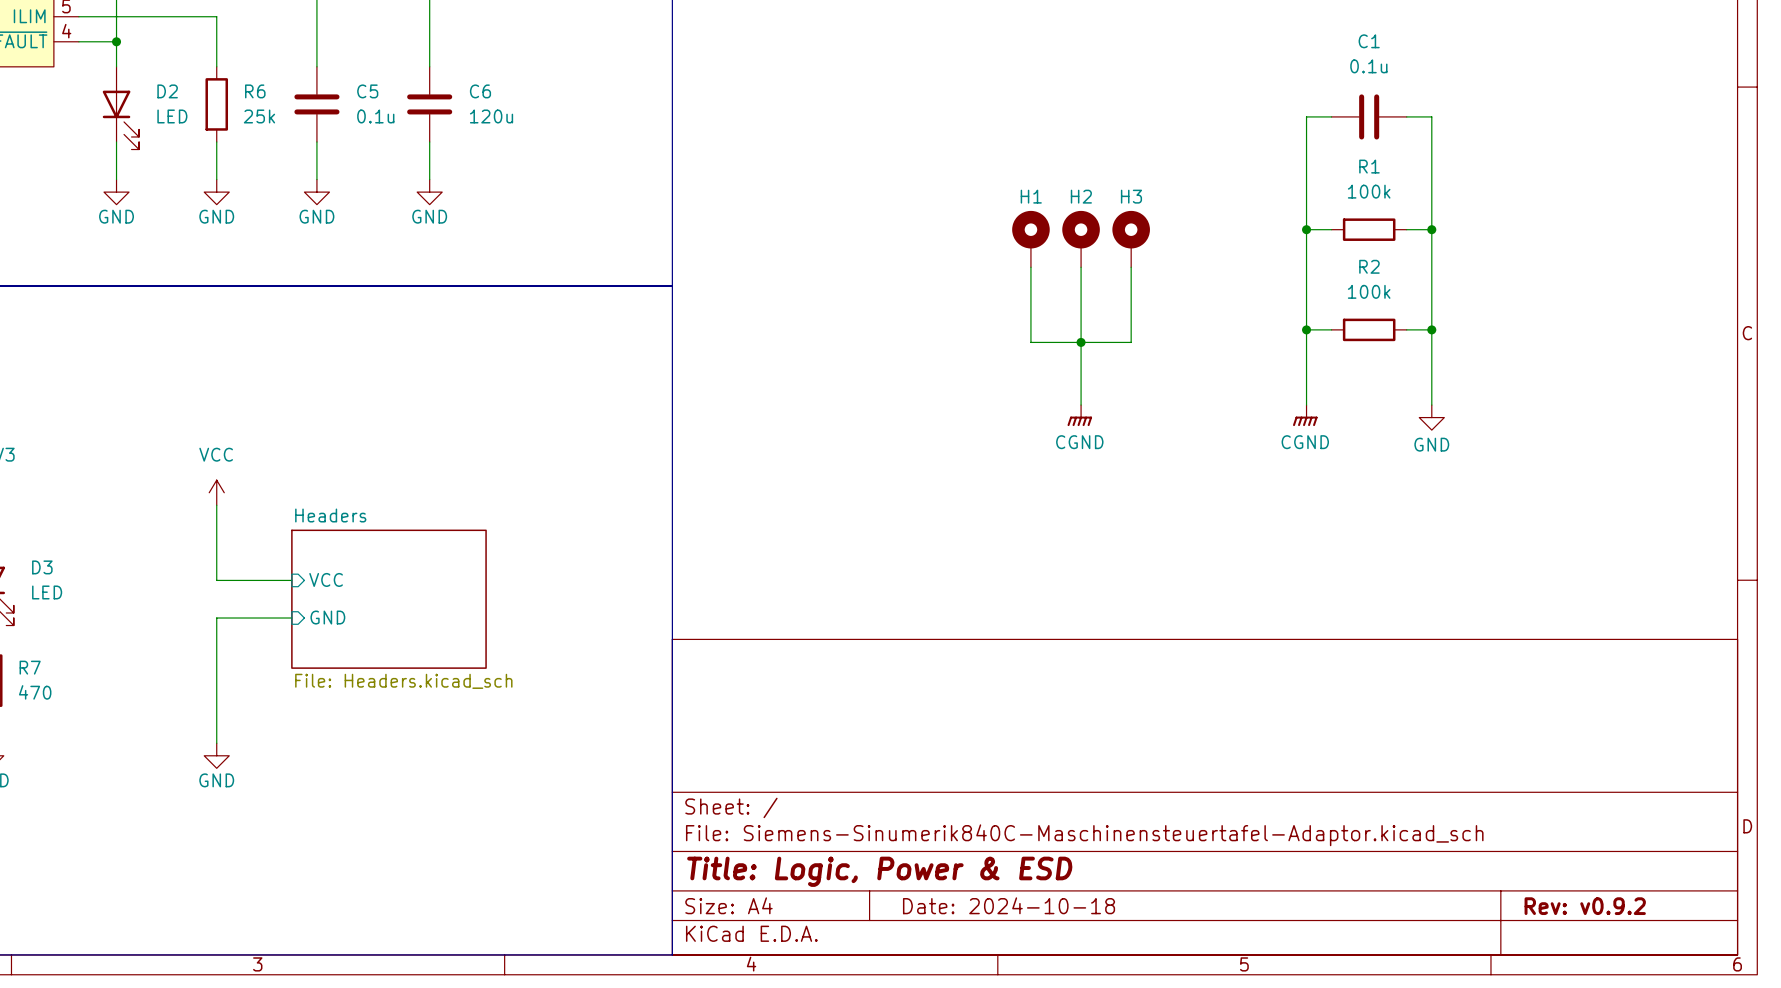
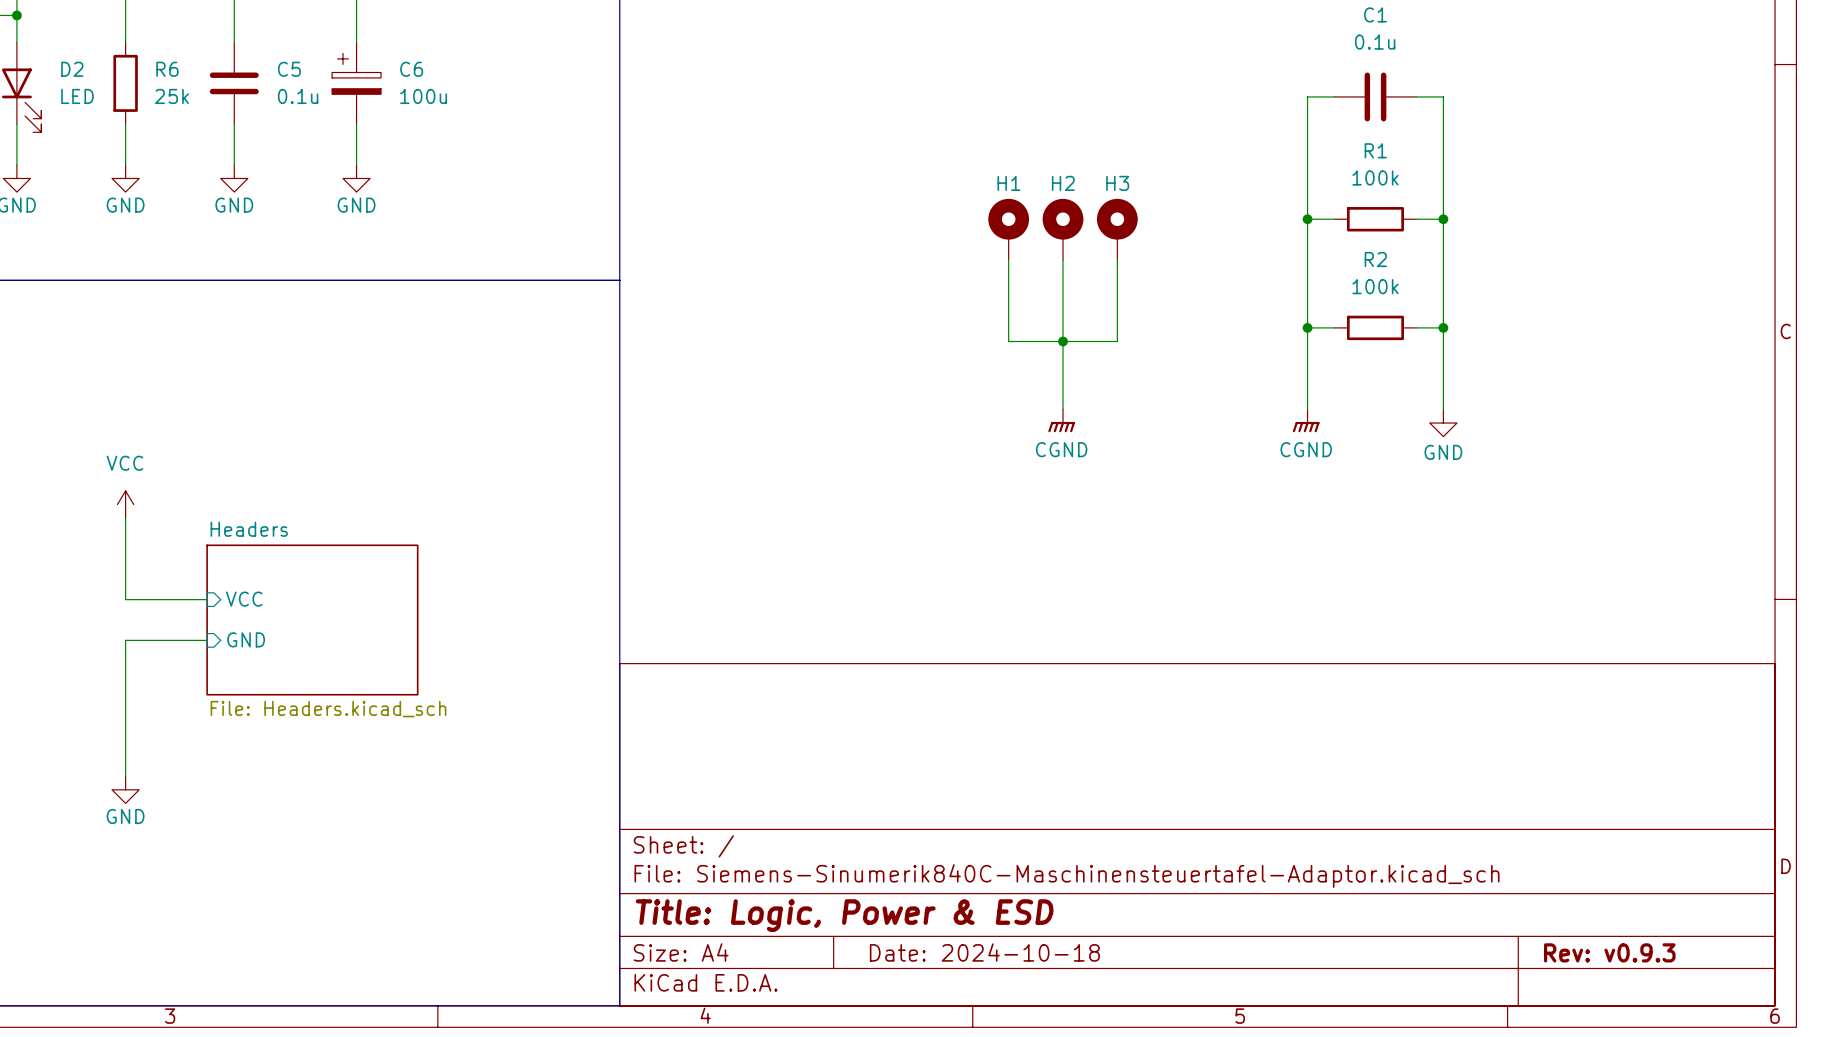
C6 symbol: [407, 66, 453, 143] -> [332, 42, 382, 125]
C6 value: 120u (491, 116) -> 100u (423, 96)
title block: Rev: v0.9.2 (1585, 906) -> Rev: v0.9.3 (1609, 952)

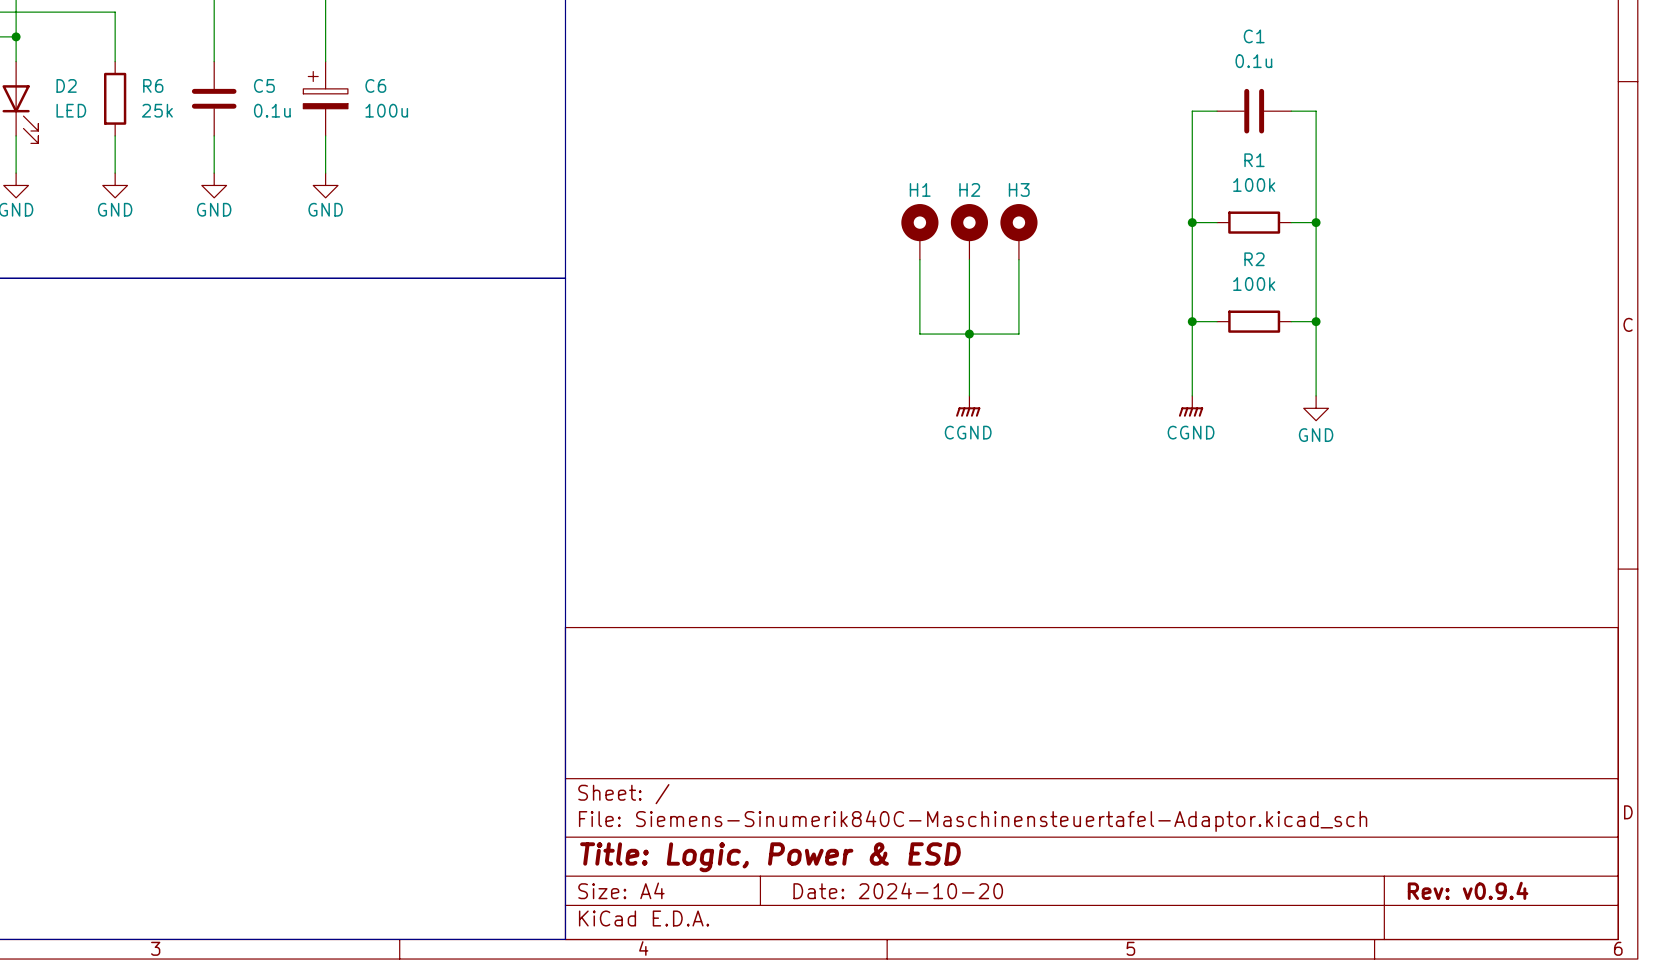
power symbol: VCC (125, 504) -> none
wire: (125, 518) (125, 599) (207, 599) -> none
sheet pin: VCC (244, 599) -> none
sheet Headers: File: Headers.kicad_sch (312, 620) -> none
sheet pin: GND (246, 639) -> none
wire: (207, 640) (125, 640) (125, 776) -> none
power symbol: GND (125, 789) -> none
title block: Date: 2024-10-18 (984, 952) -> Date: 2024-10-20 (898, 890)
title block: Rev: v0.9.3 (1609, 952) -> Rev: v0.9.4 (1468, 890)

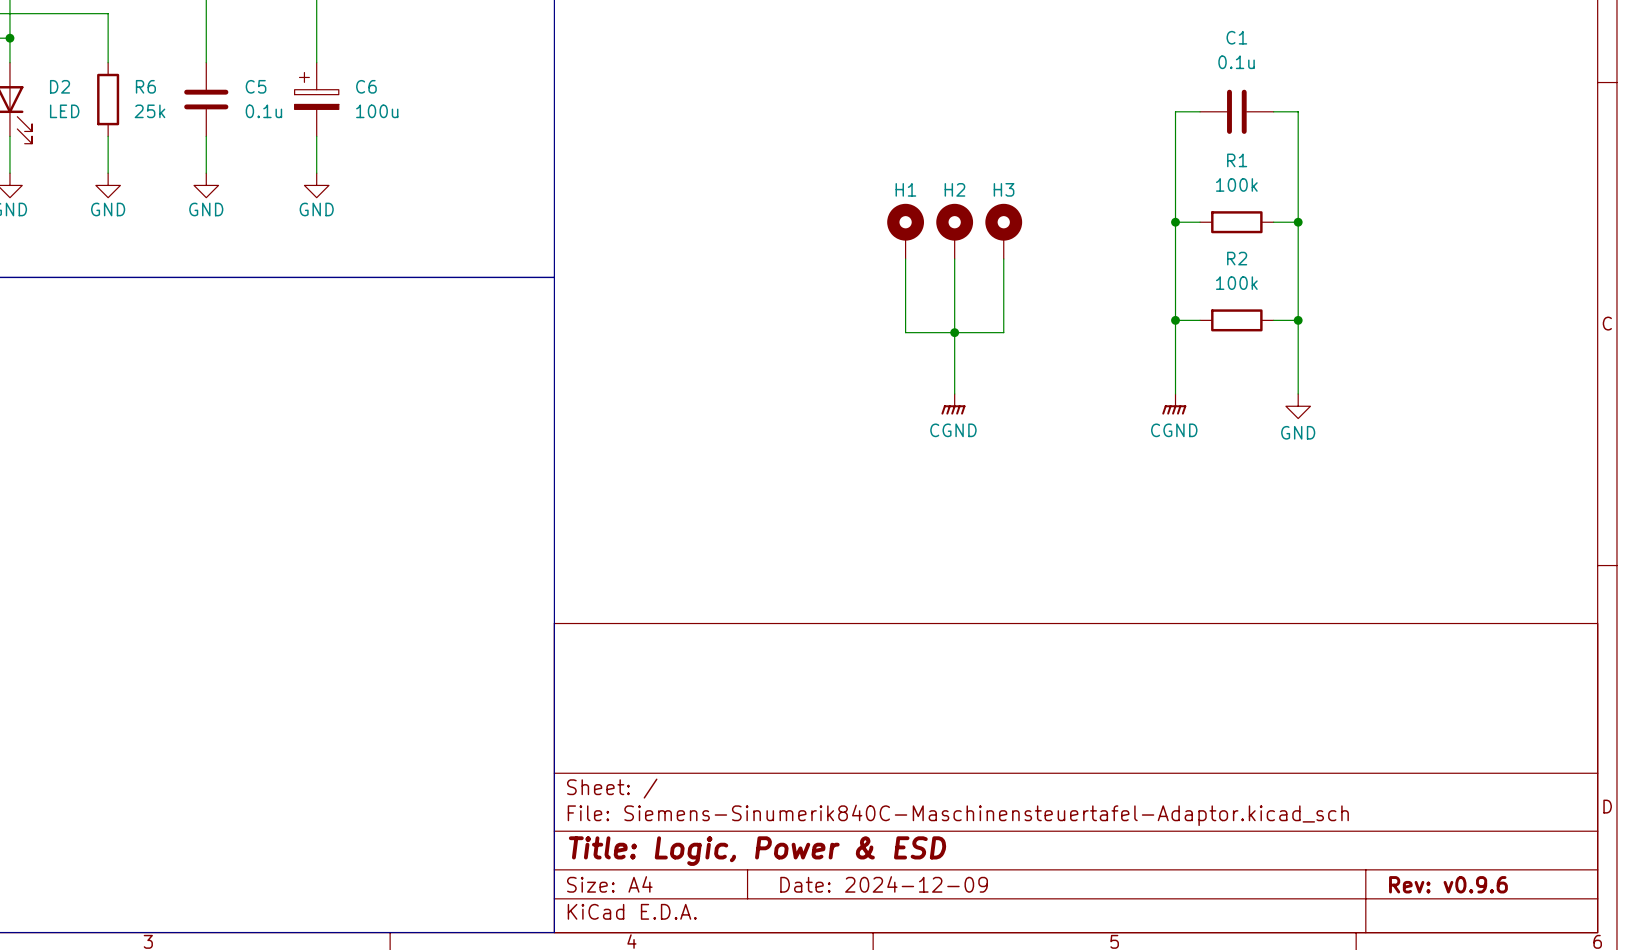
title block: Date: 2024-10-20 (898, 890) -> Date: 2024-12-09 (884, 884)
title block: Rev: v0.9.4 (1468, 890) -> Rev: v0.9.6 (1448, 884)

